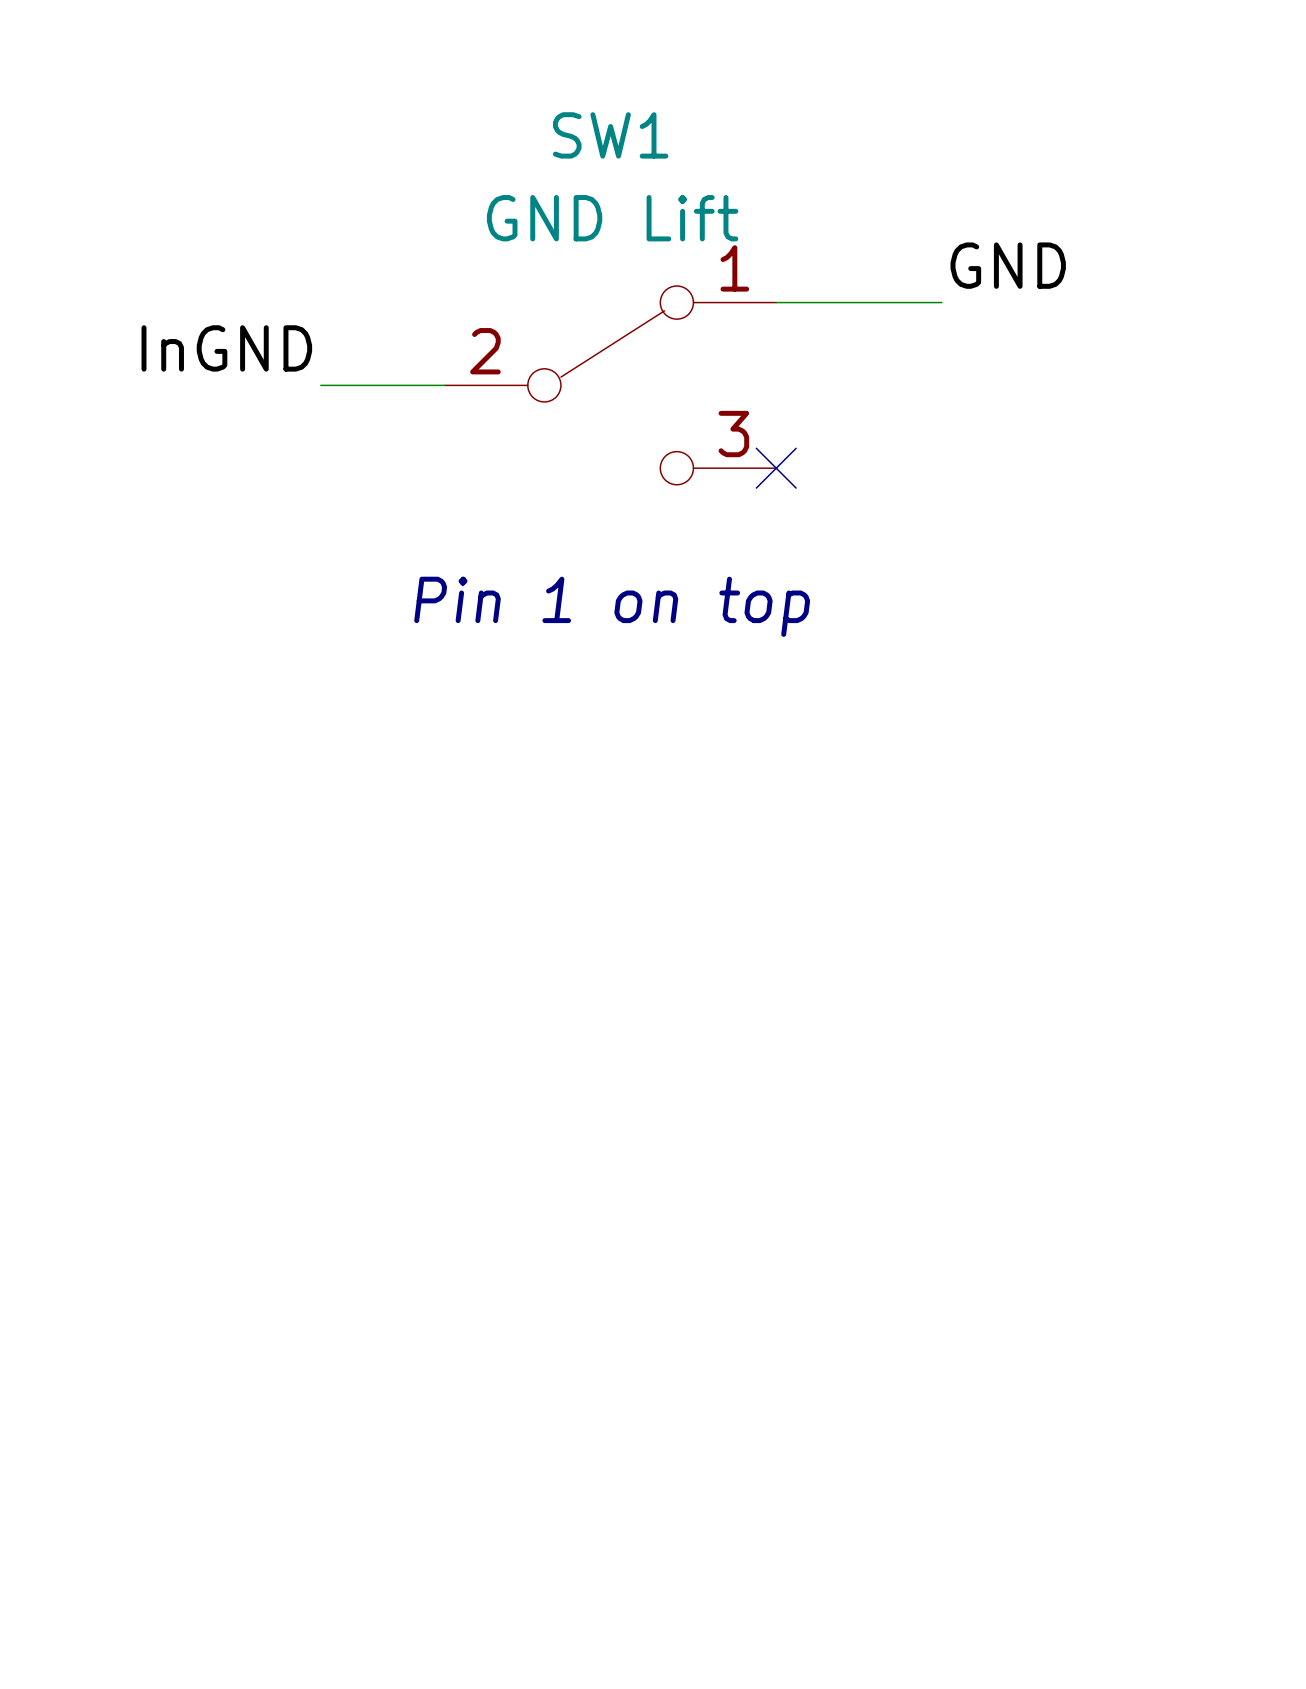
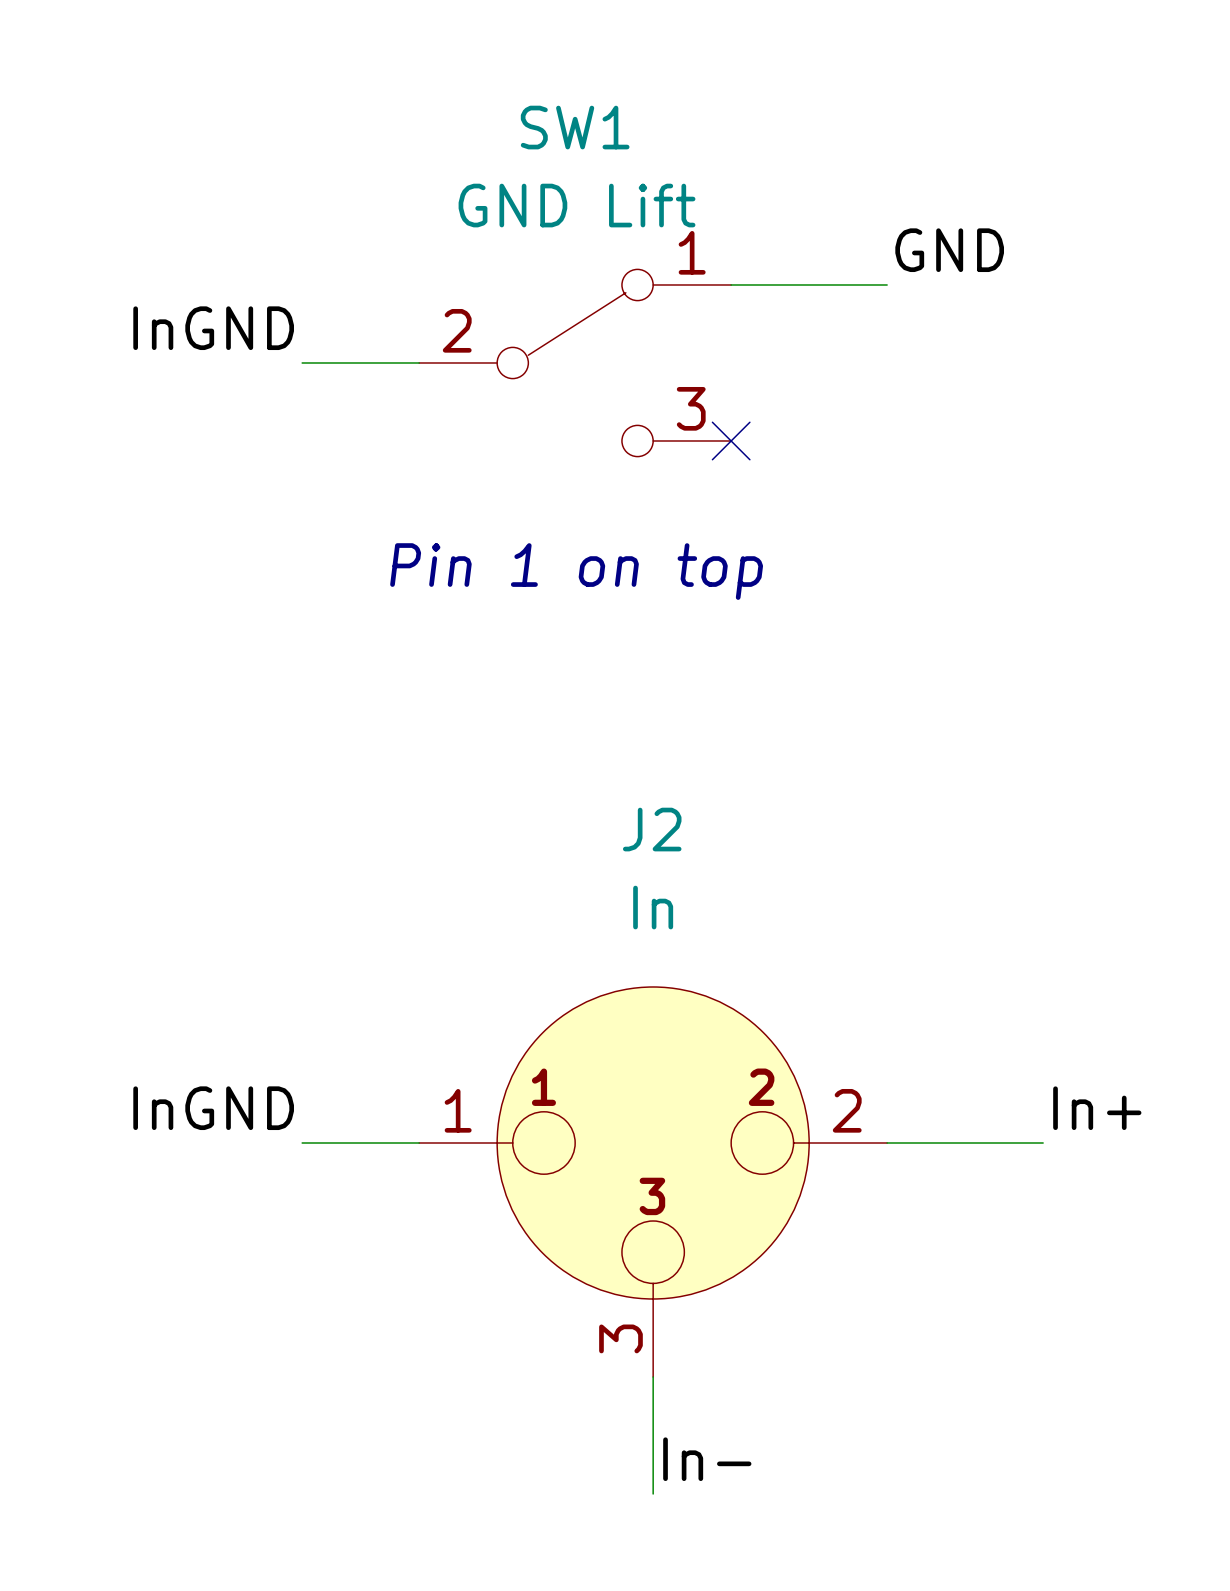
label: none -> InGND (213, 1108)
label: none -> In+ (1097, 1108)
wire: none -> (302, 1143) (419, 1143)
wire: none -> (887, 1143) (1043, 1143)
J2: none -> In (653, 1182)
wire: none -> (653, 1377) (653, 1494)
label: none -> In- (707, 1459)

